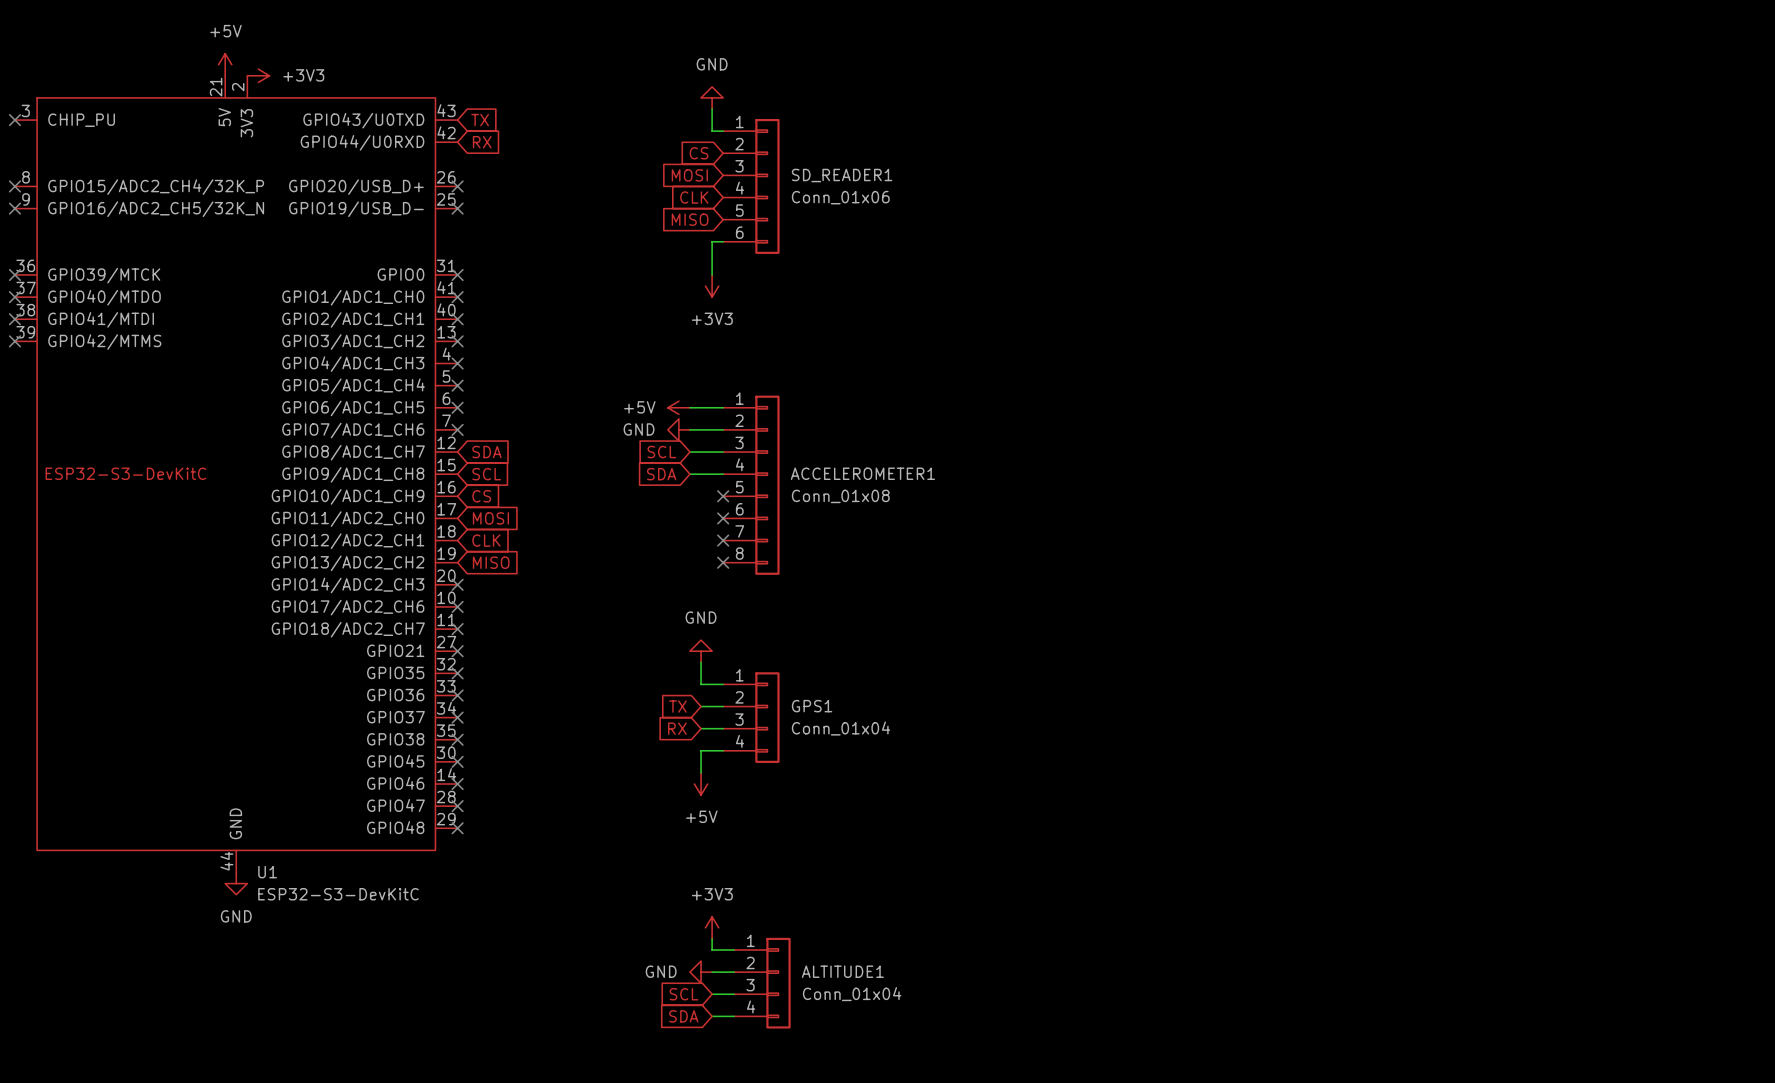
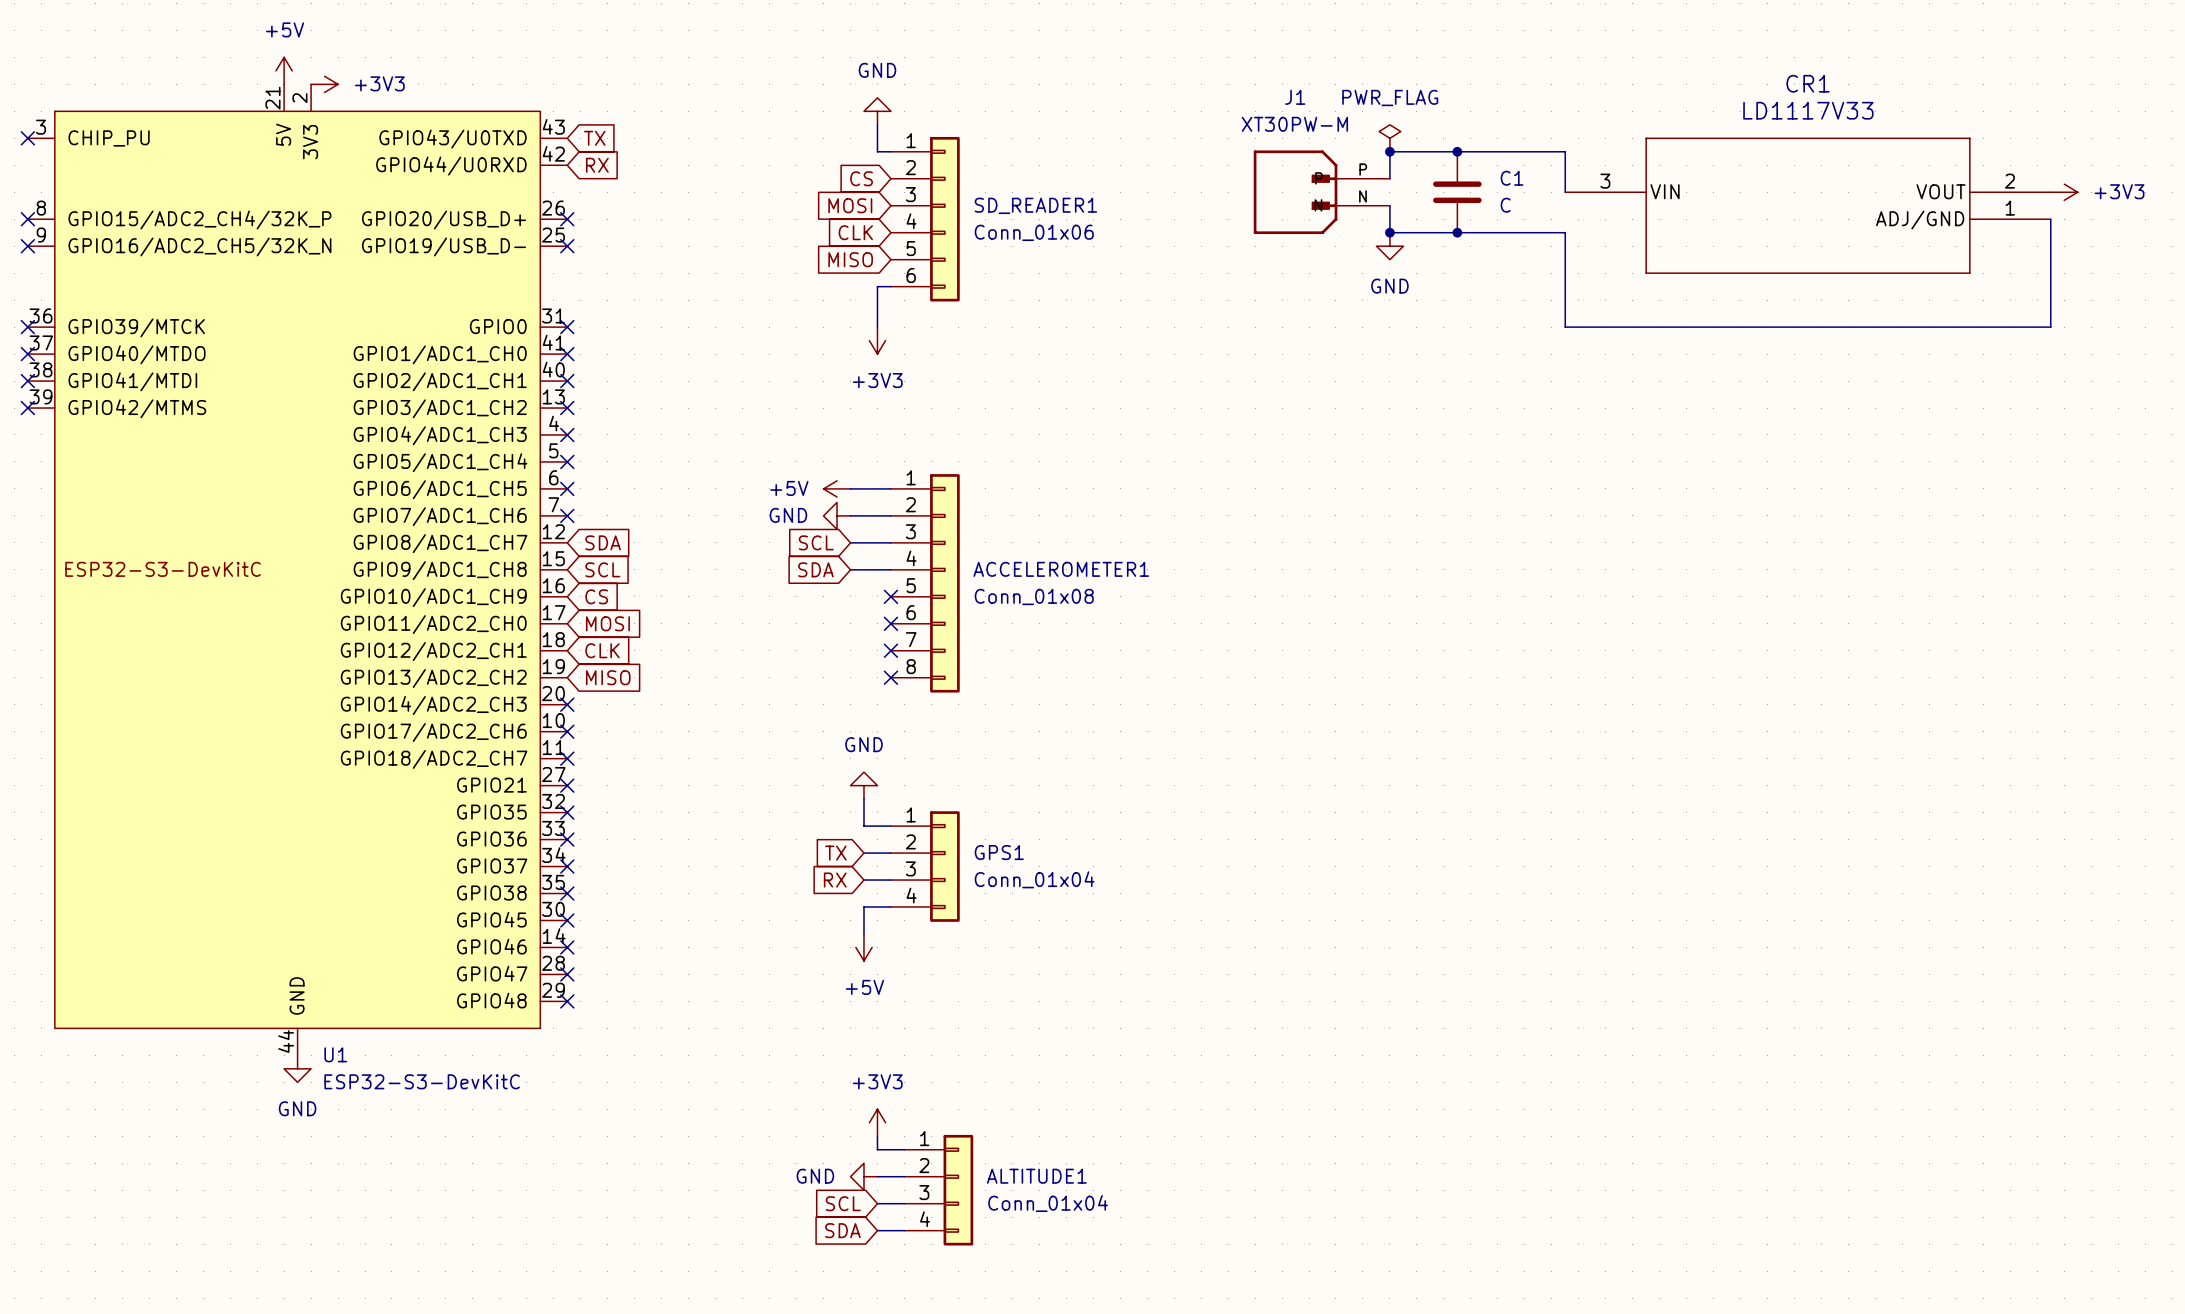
power symbol: none -> PWR_FLAG (1389, 138)
junction: none -> (1389, 151)
junction: none -> (1457, 151)
wire: none -> (1389, 178) (1389, 151) (1565, 151) (1565, 192)
J1: none -> XT30PW-M (1321, 192)
C1: none -> C (1457, 192)
power symbol: none -> +3V3 (2064, 192)
wire: none -> (1389, 205) (1389, 232) (1565, 232) (1565, 327) (2050, 327) (2050, 219)
CR1: none -> LD1117V33 (1808, 205)
junction: none -> (1389, 232)
junction: none -> (1457, 232)
power symbol: none -> GND (1389, 246)

